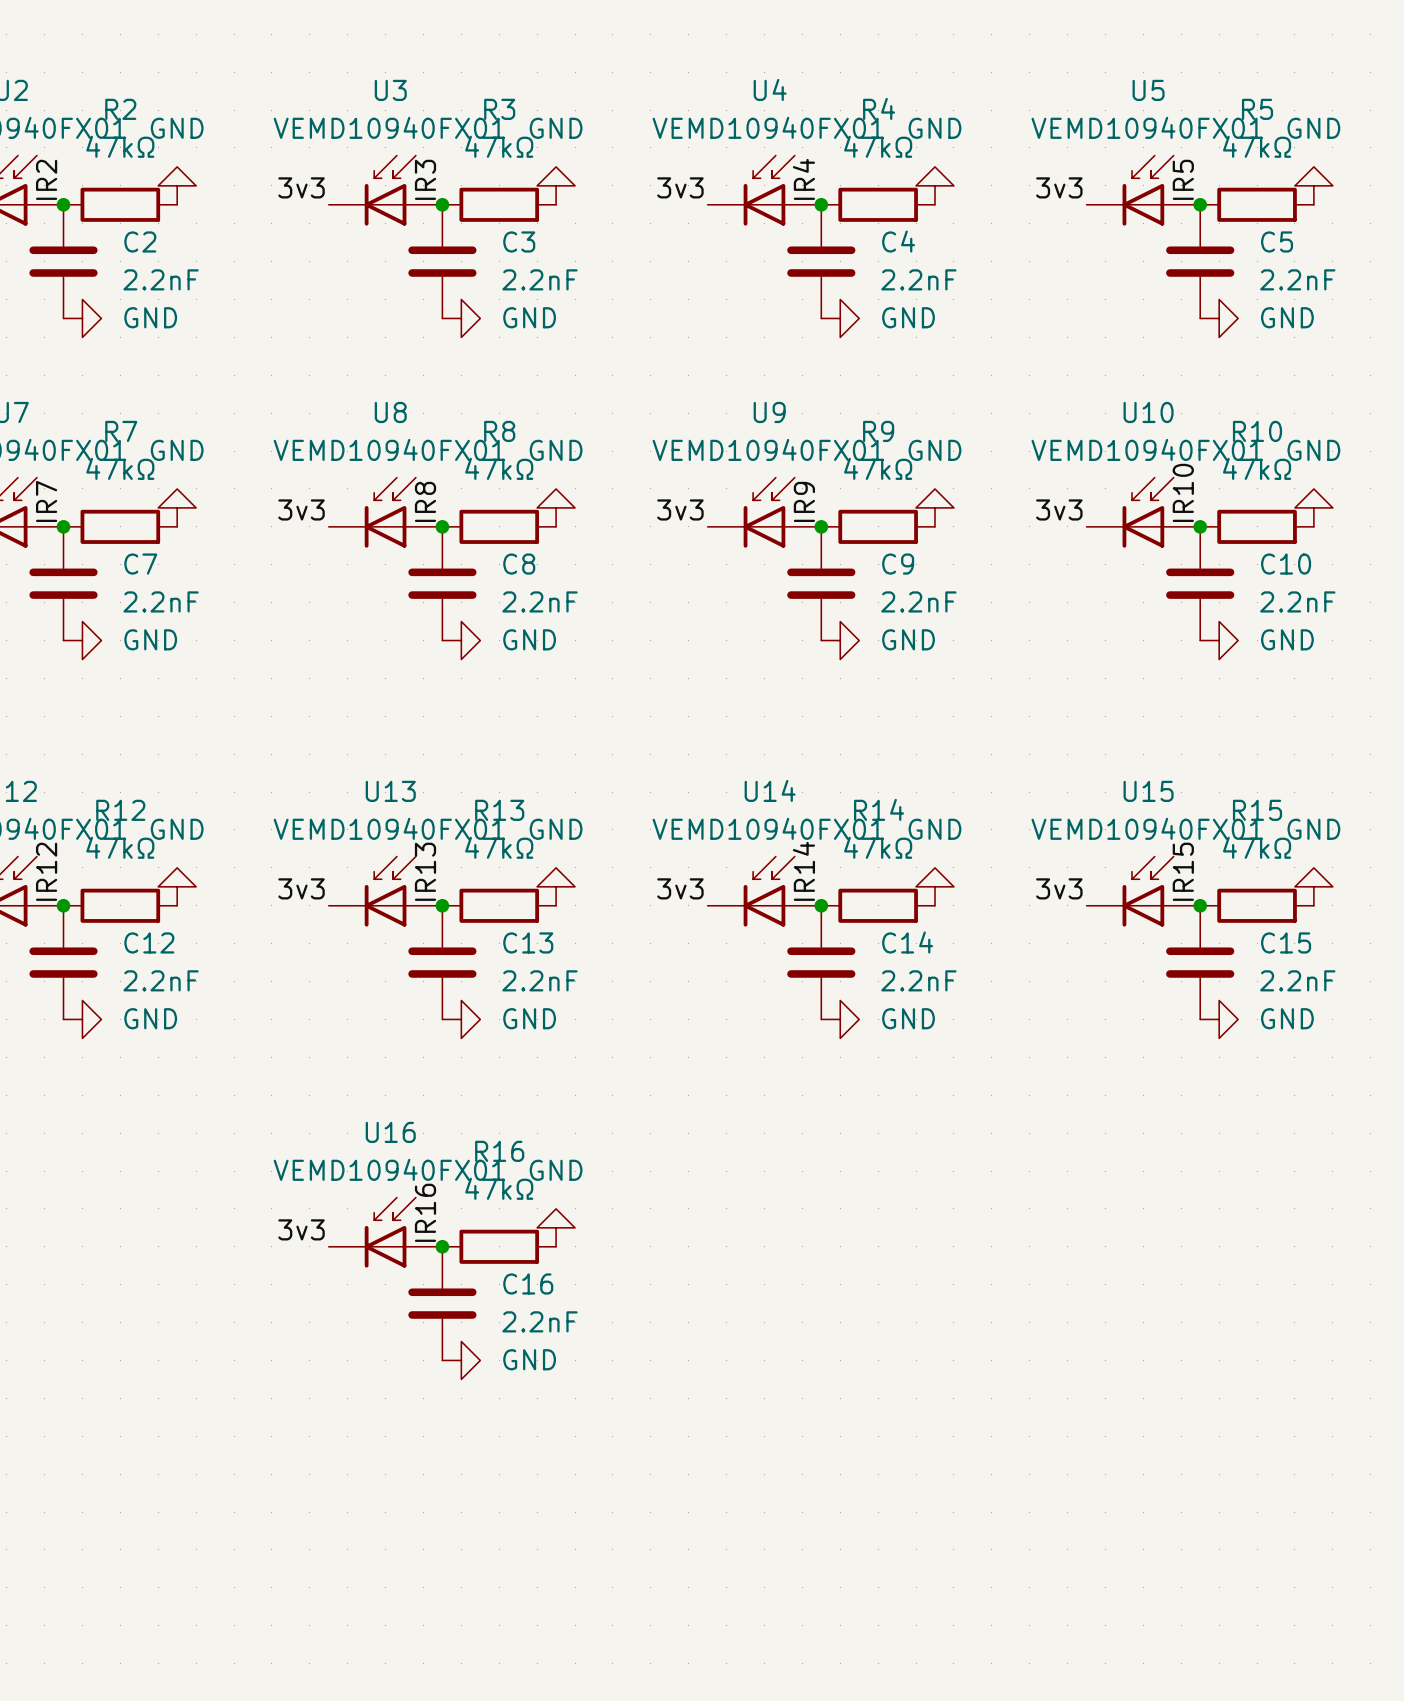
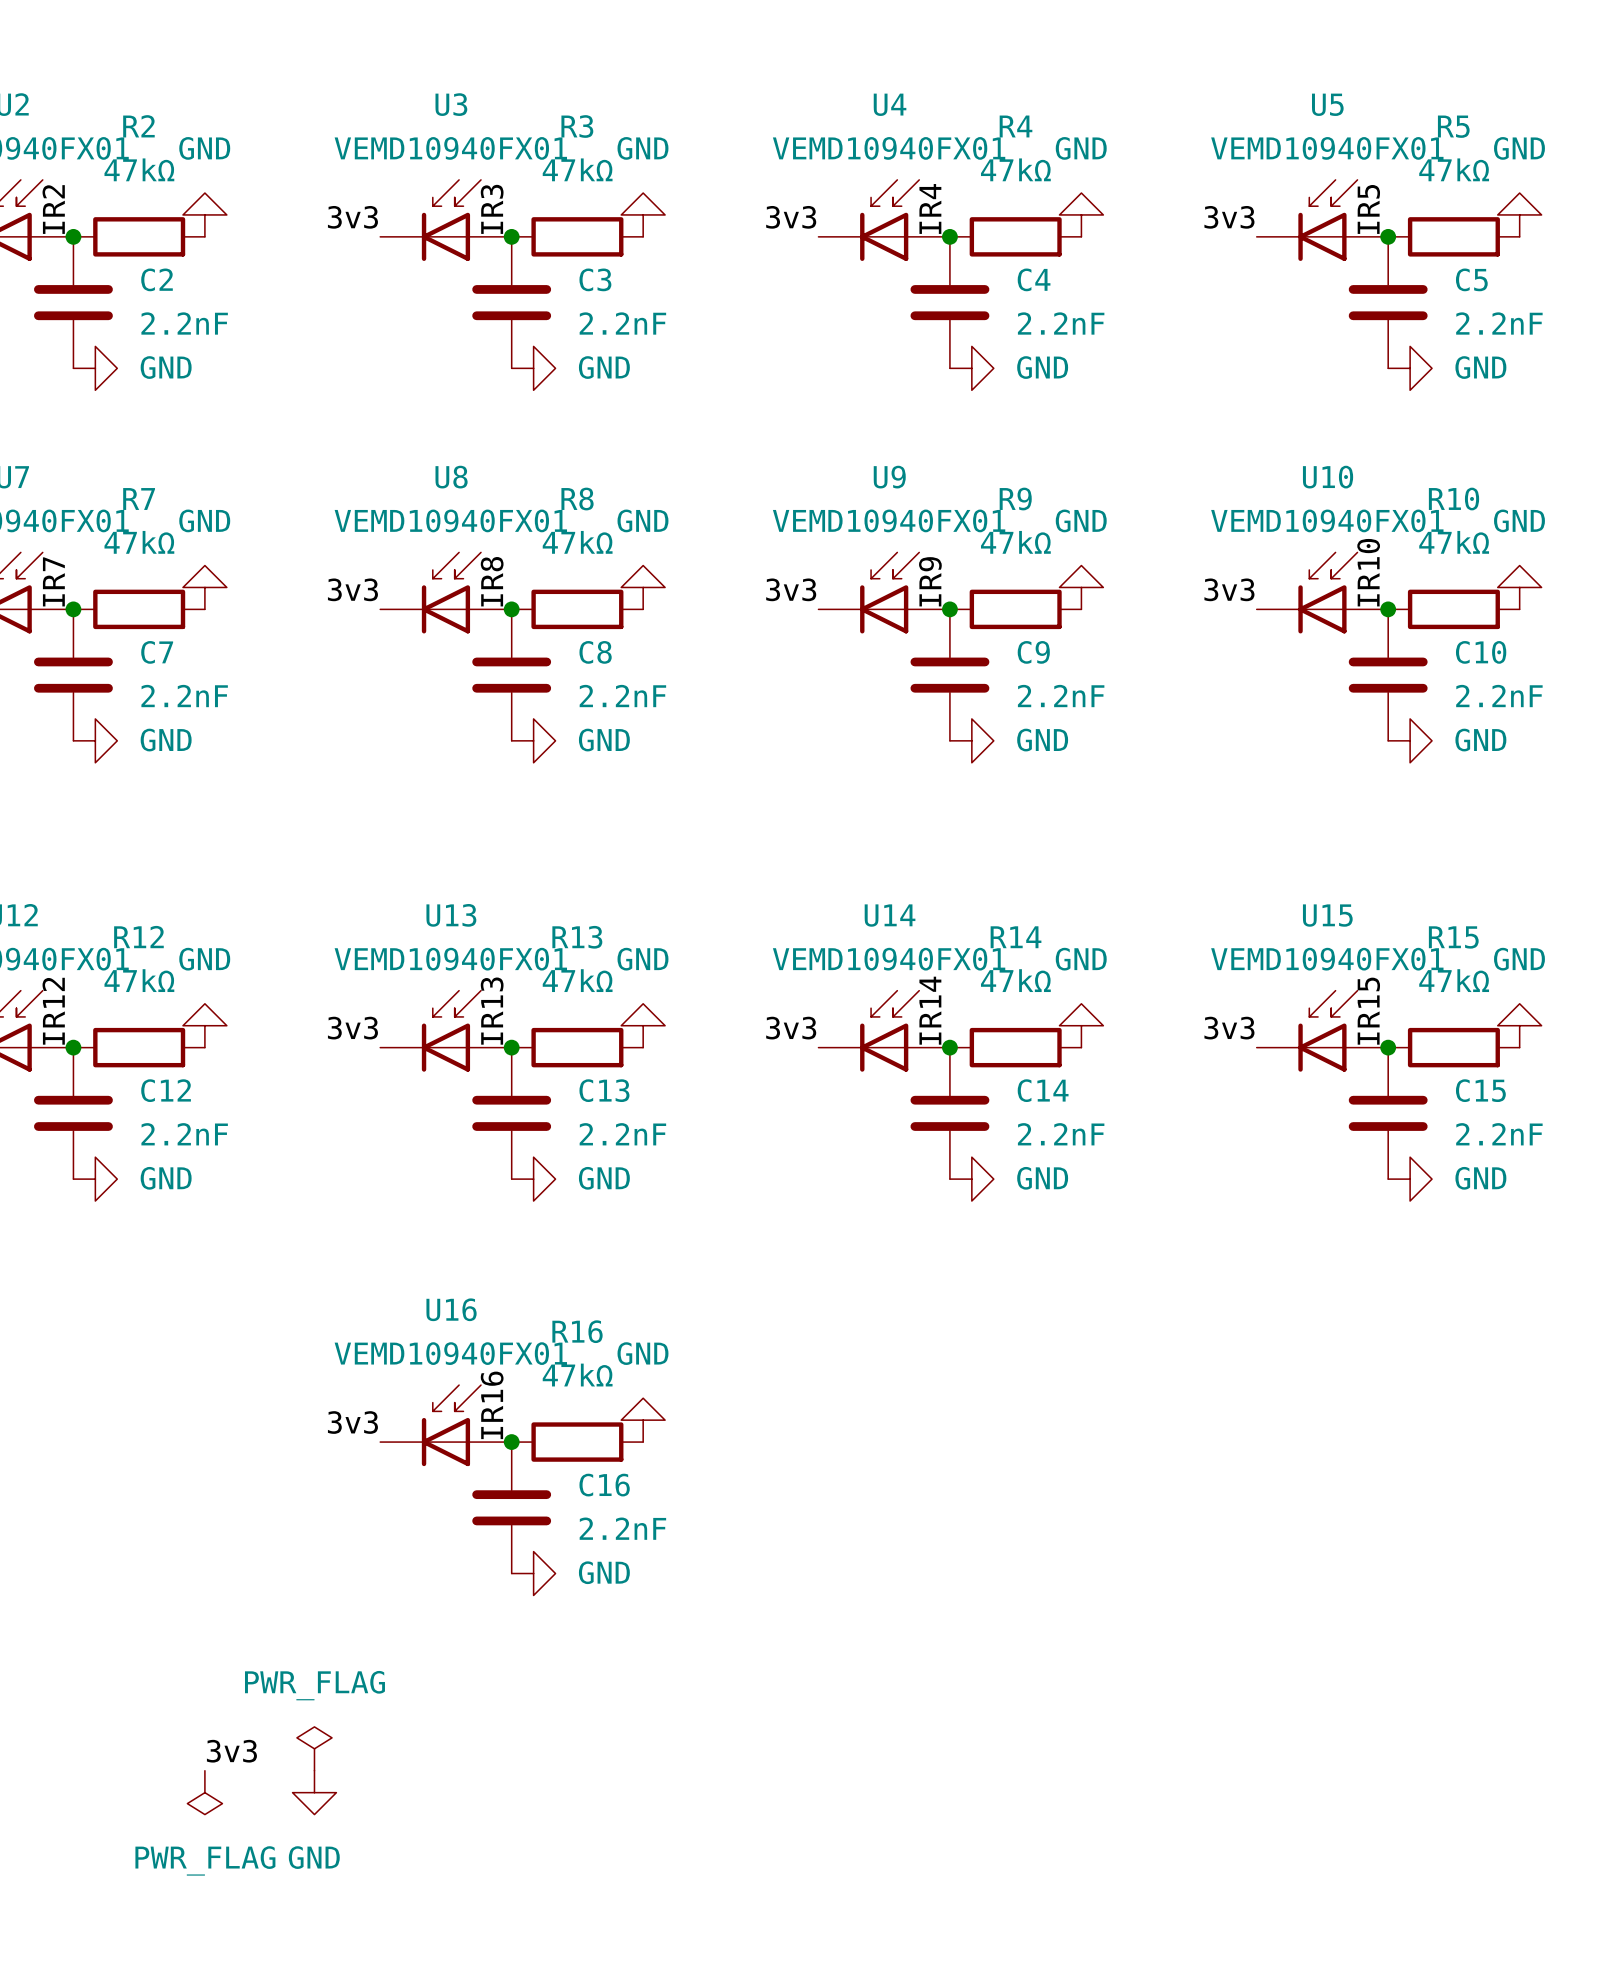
power symbol: none -> PWR_FLAG (314, 1748)
label: none -> 3v3 (231, 1751)
power symbol: none -> PWR_FLAG (204, 1792)
power symbol: none -> GND (314, 1792)

